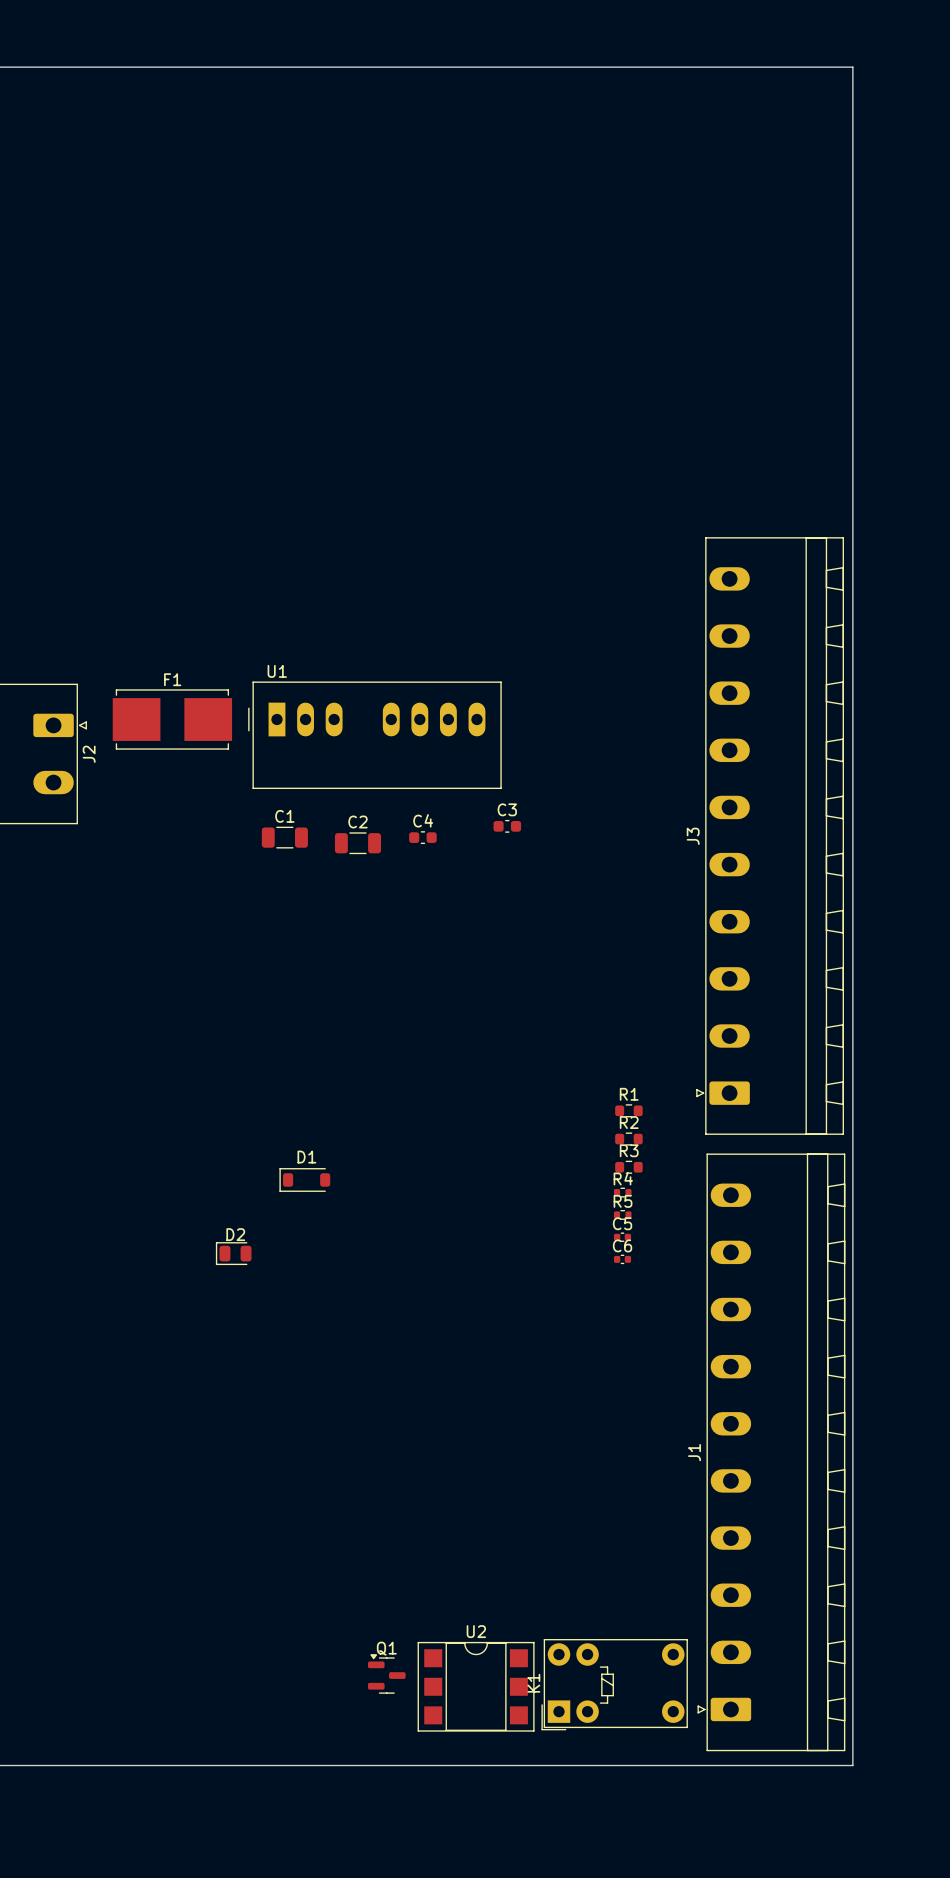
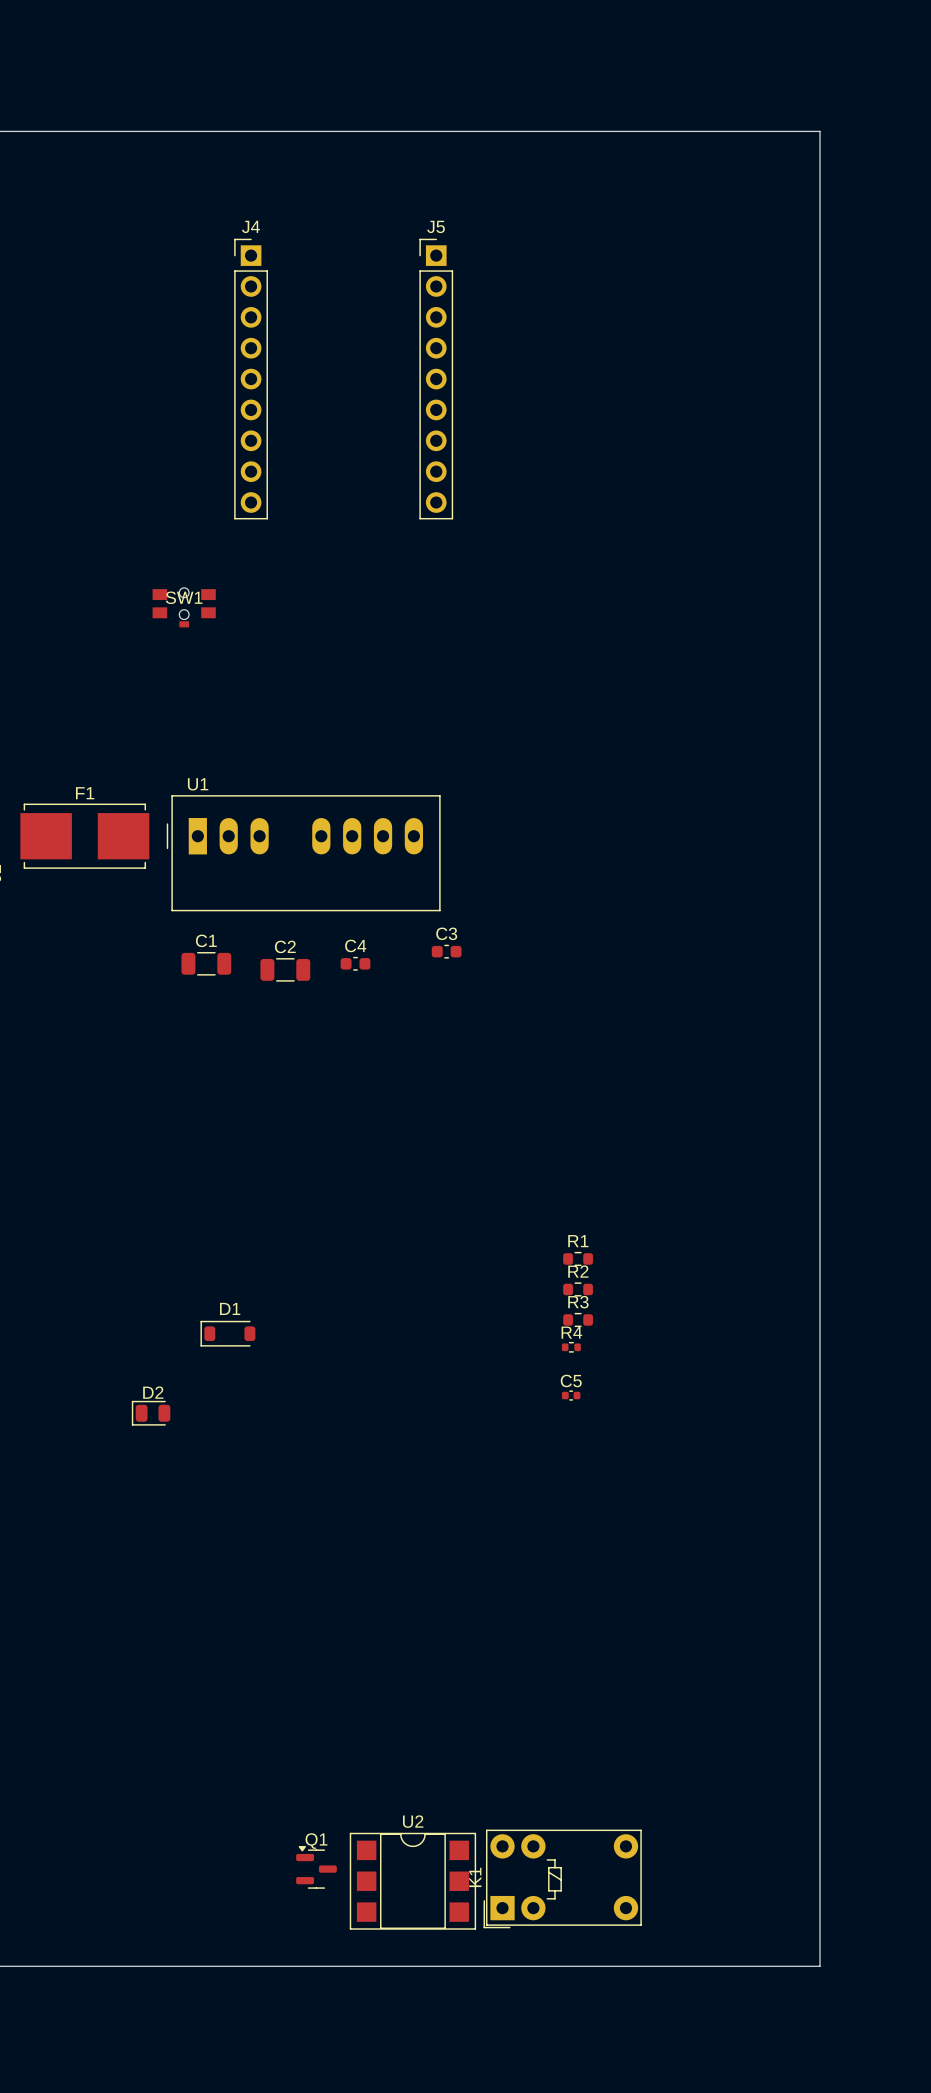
J4: none -> (251, 379)
J5: none -> (436, 379)
SW1: none -> (184, 607)
J3: (770, 836) -> none
R5: (622, 1214) -> none
C6: (622, 1259) -> none
J1: (771, 1452) -> none

